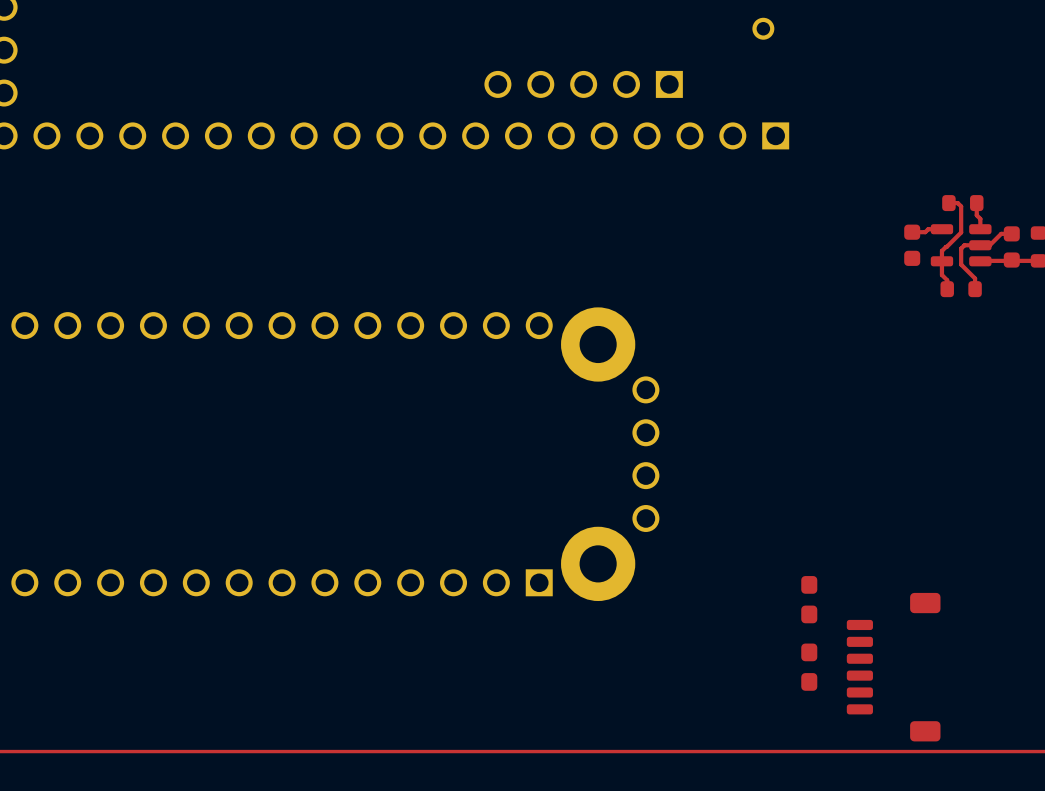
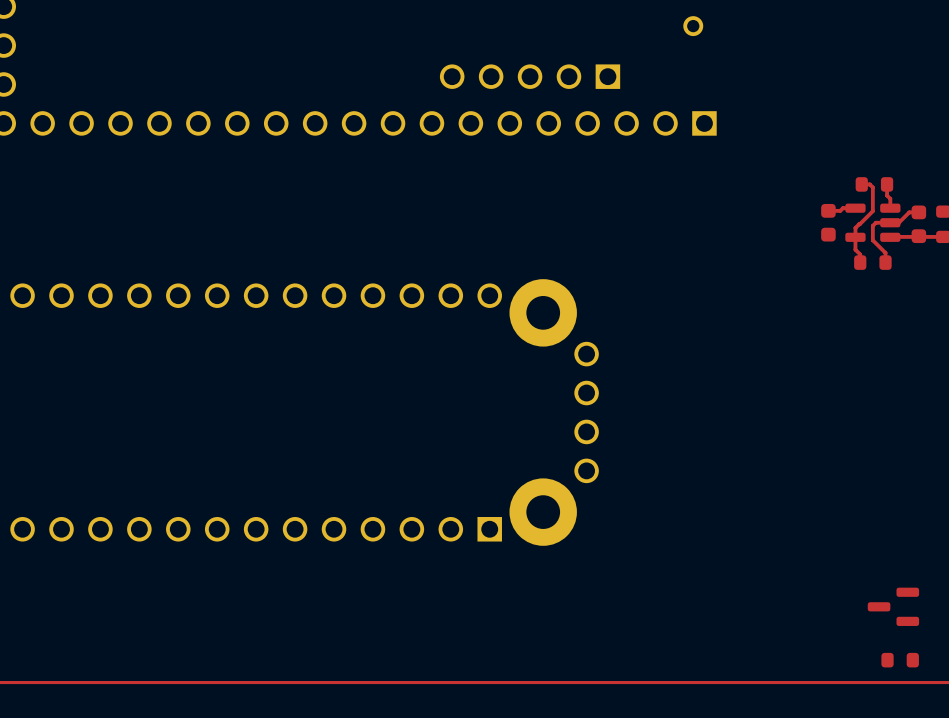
part: (809, 599) -> none
part: (809, 667) -> none
part: (893, 667) -> none
part: none -> (893, 606)
part: none -> (900, 660)

